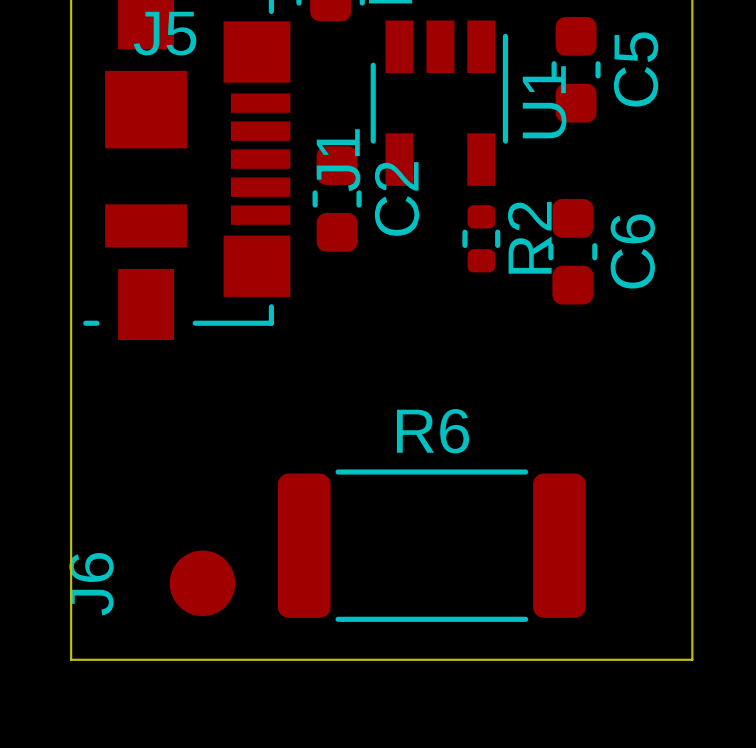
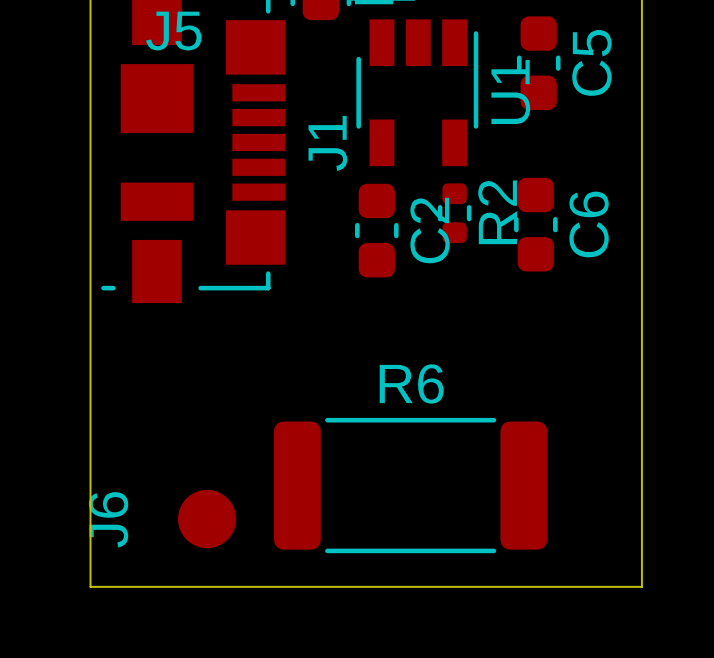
C2 position: (337, 198) -> (376, 230)

